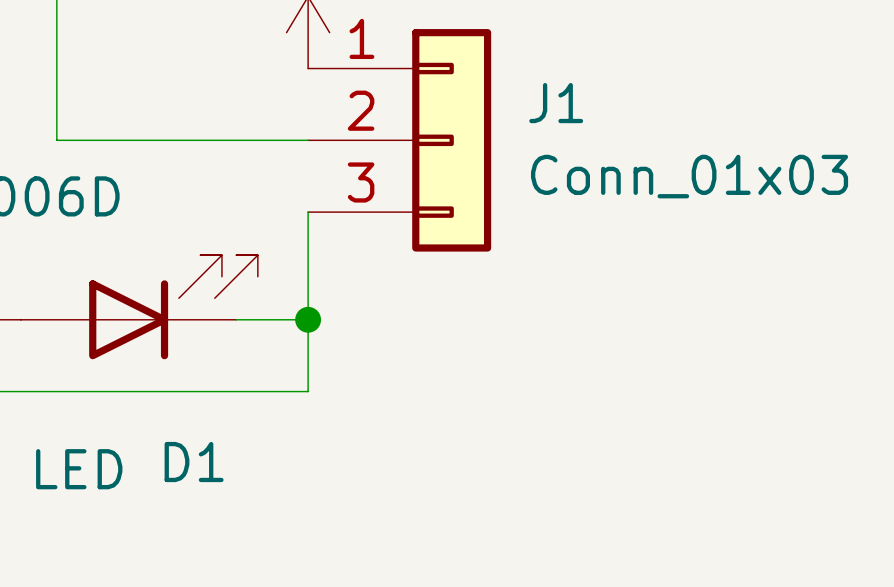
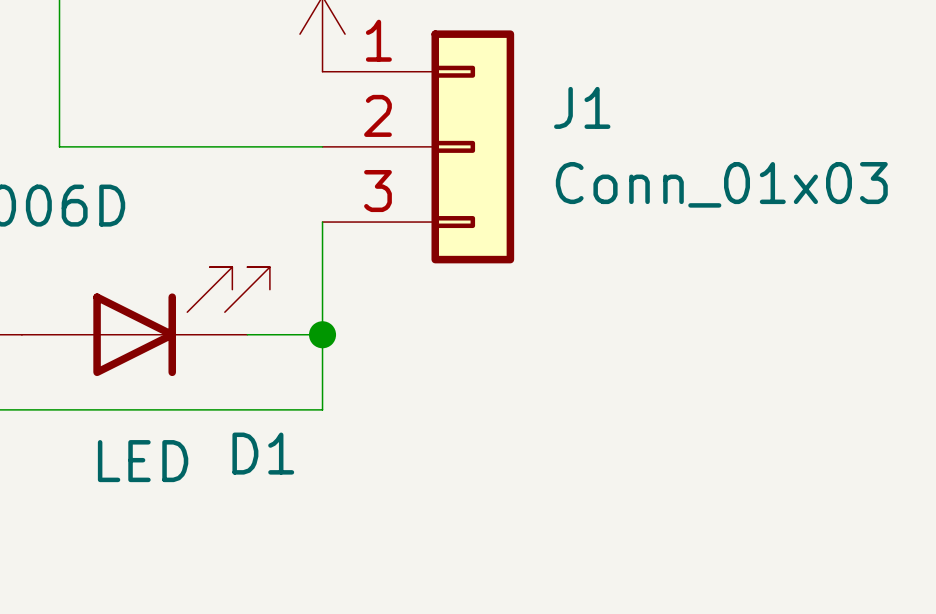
D1 name position: D1 (194, 462) -> D1 (263, 453)
D1 value position: LED (79, 469) -> LED (143, 461)

